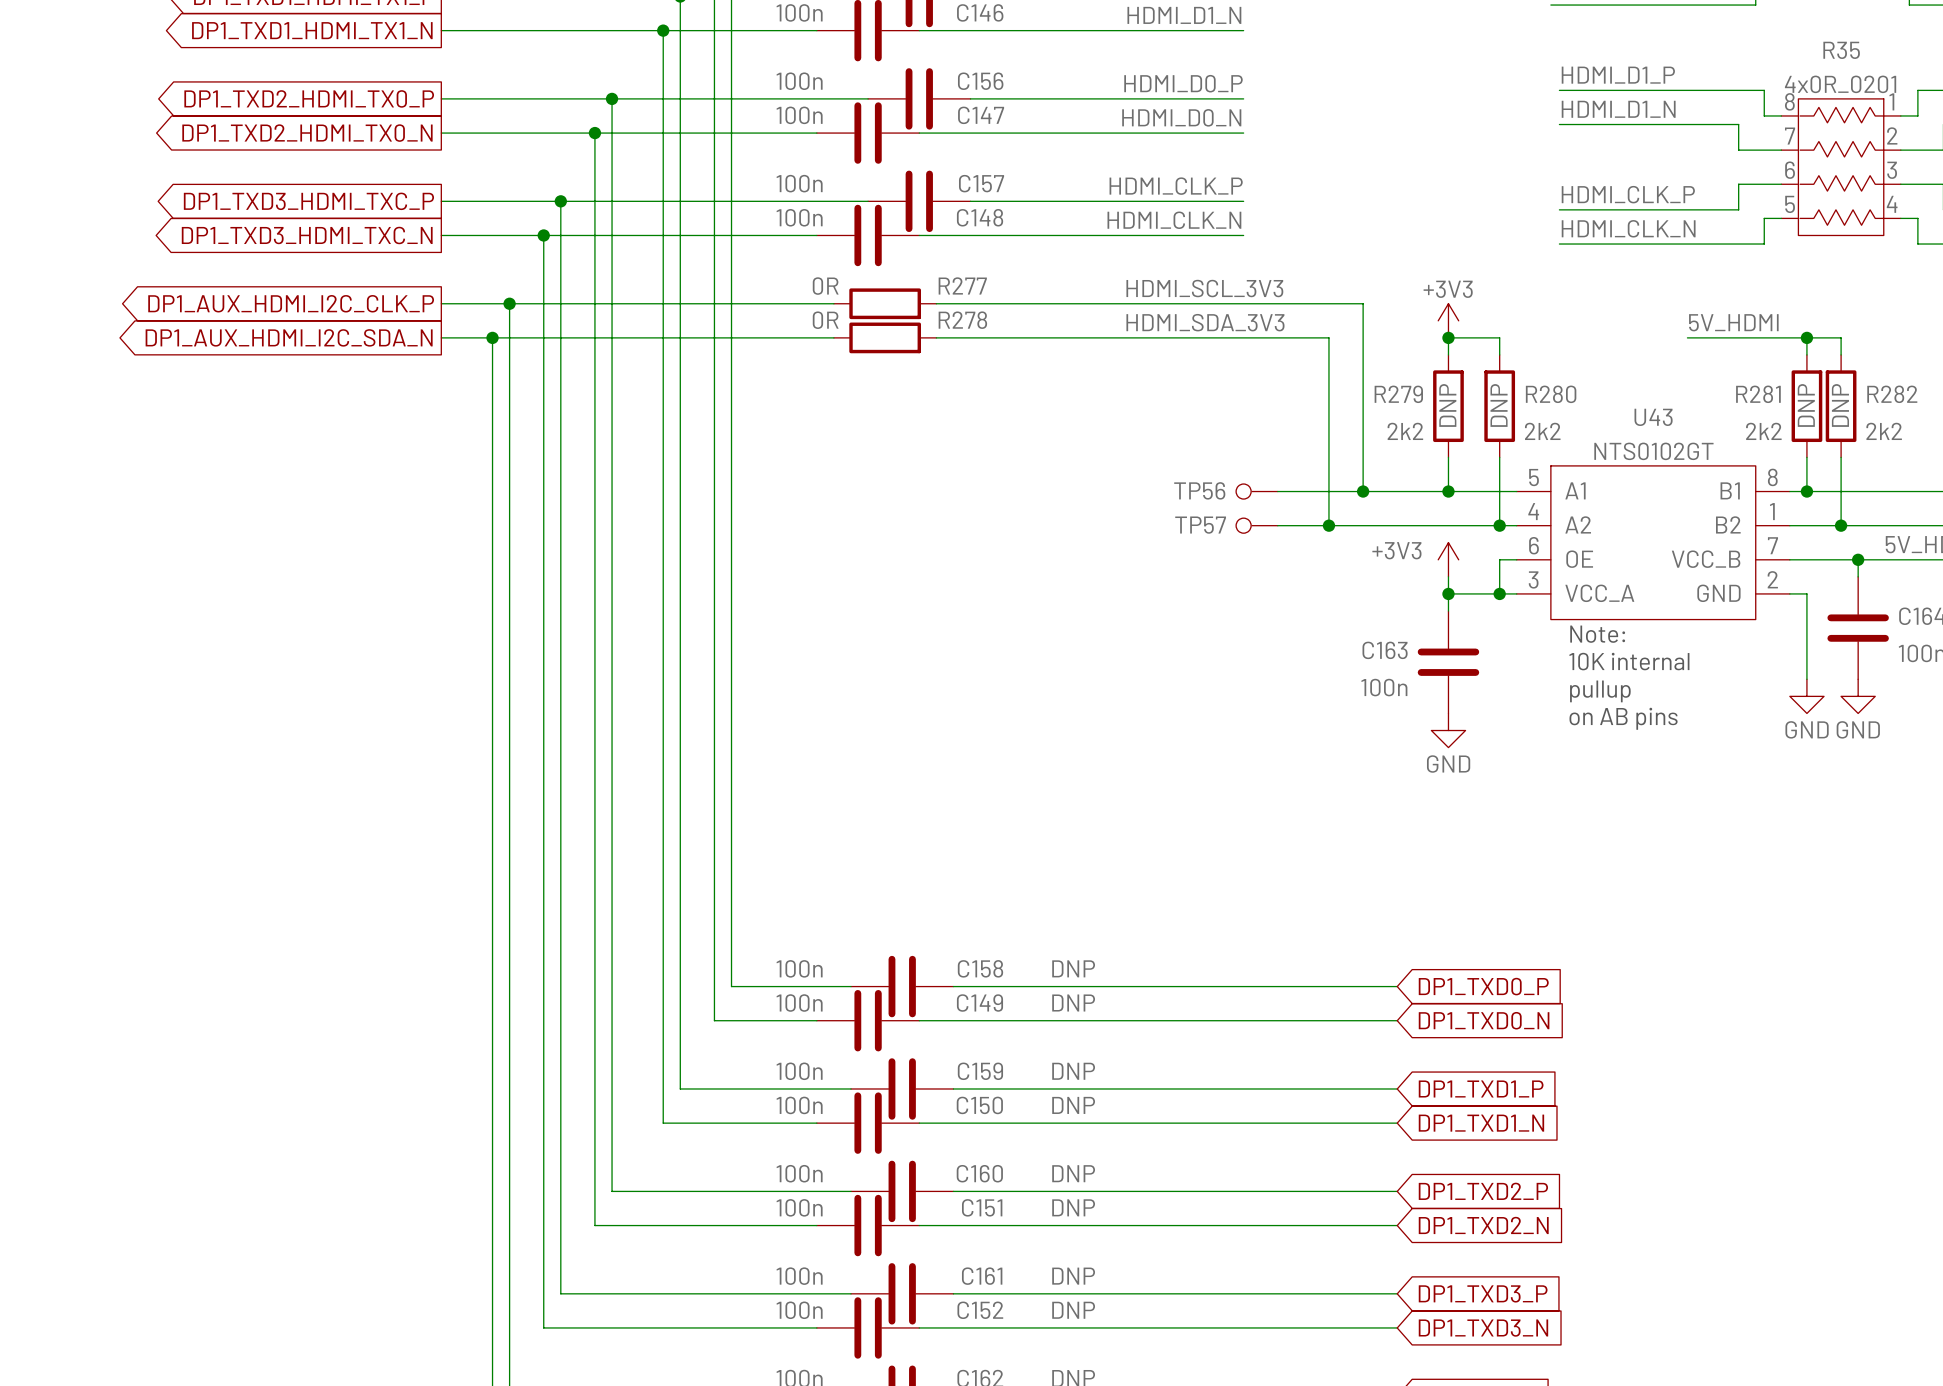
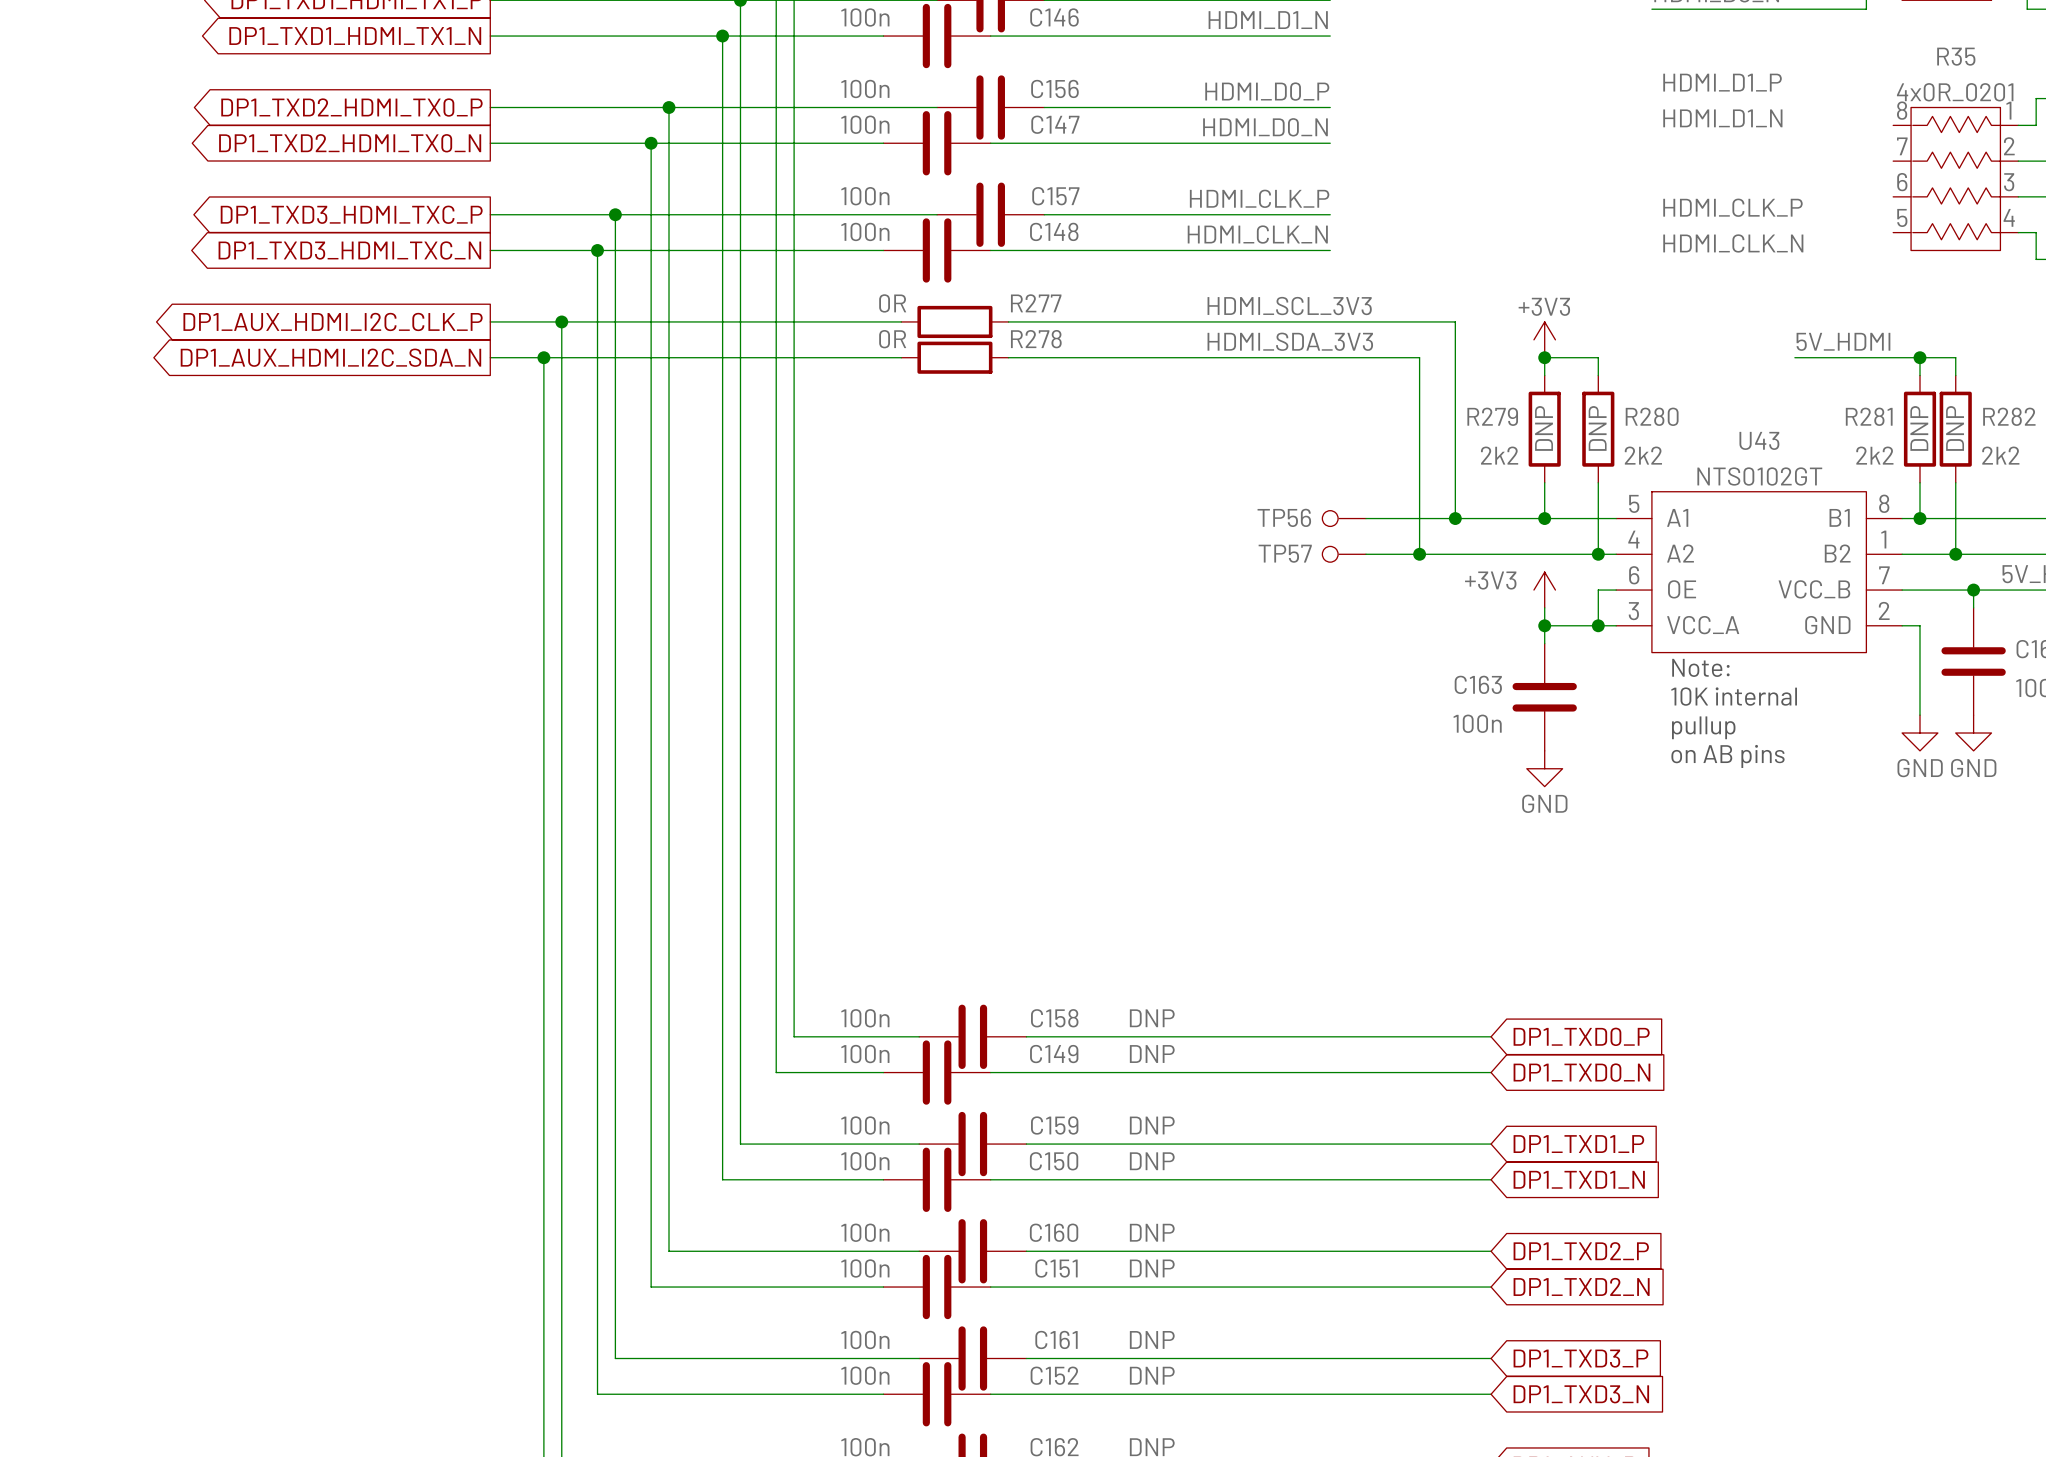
wire: (1559, 90) (1764, 90) (1764, 115) (1781, 115) -> none
wire: (1559, 124) (1738, 124) (1738, 150) (1781, 150) -> none
wire: (1781, 184) (1738, 184) (1738, 209) (1559, 209) -> none
wire: (1781, 218) (1764, 218) (1764, 244) (1559, 244) -> none

